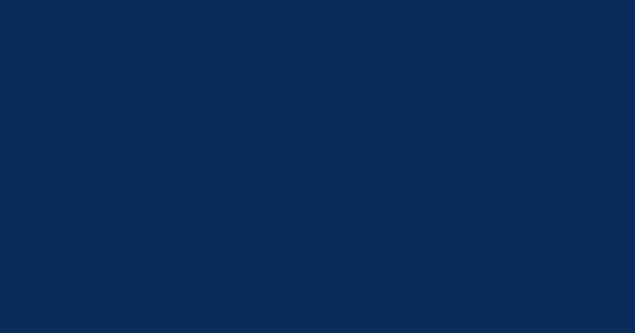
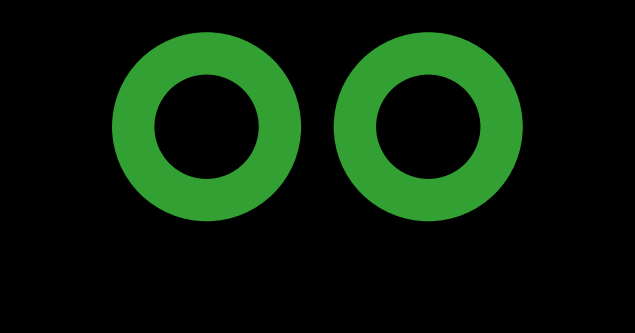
part: none -> (206, 126)
part: none -> (428, 126)

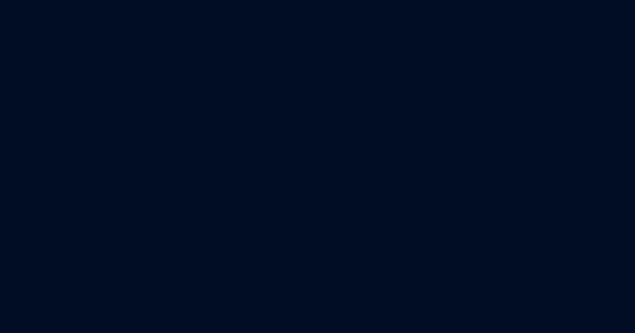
part: (206, 126) -> none
part: (428, 126) -> none

